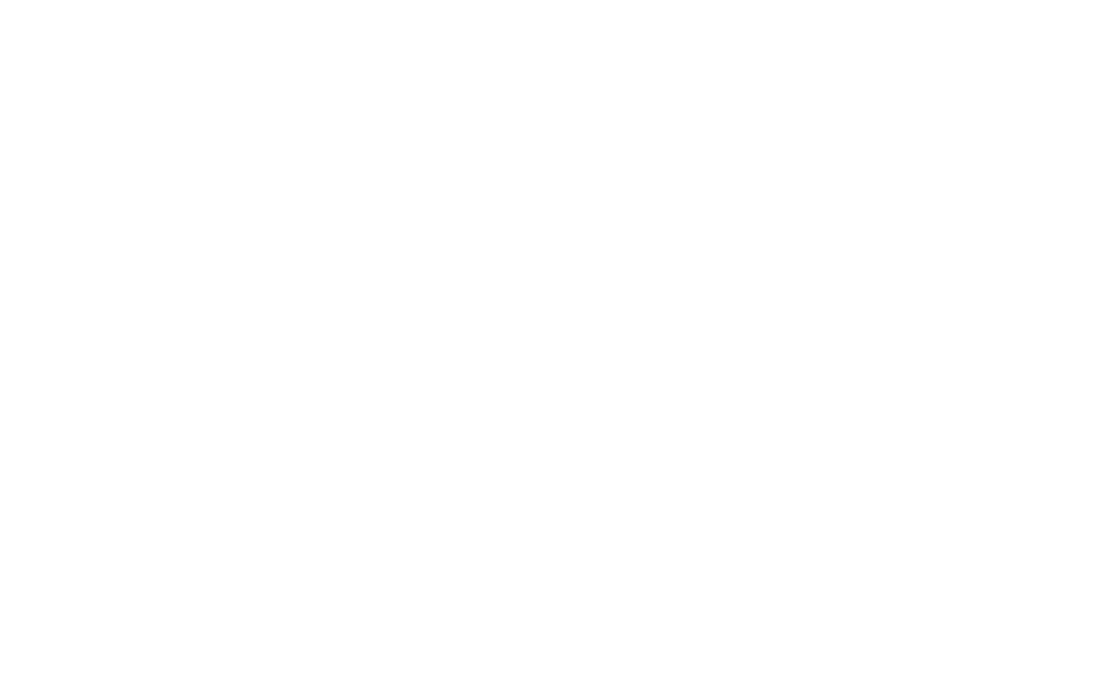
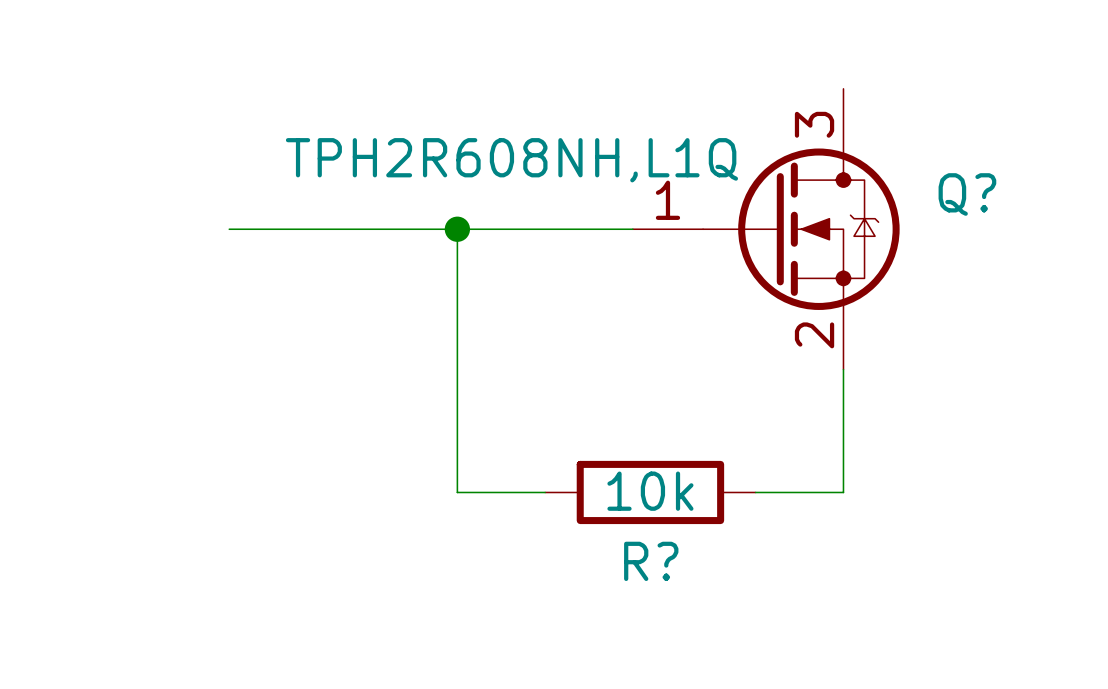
wire: none -> (229, 229) (632, 229)
wire: none -> (457, 229) (457, 492) (545, 492)
junction: none -> (457, 229)
Q?: none -> TPH2R608NH,L1Q (766, 229)
wire: none -> (843, 369) (843, 492) (755, 492)
R?: none -> 10k (650, 492)

